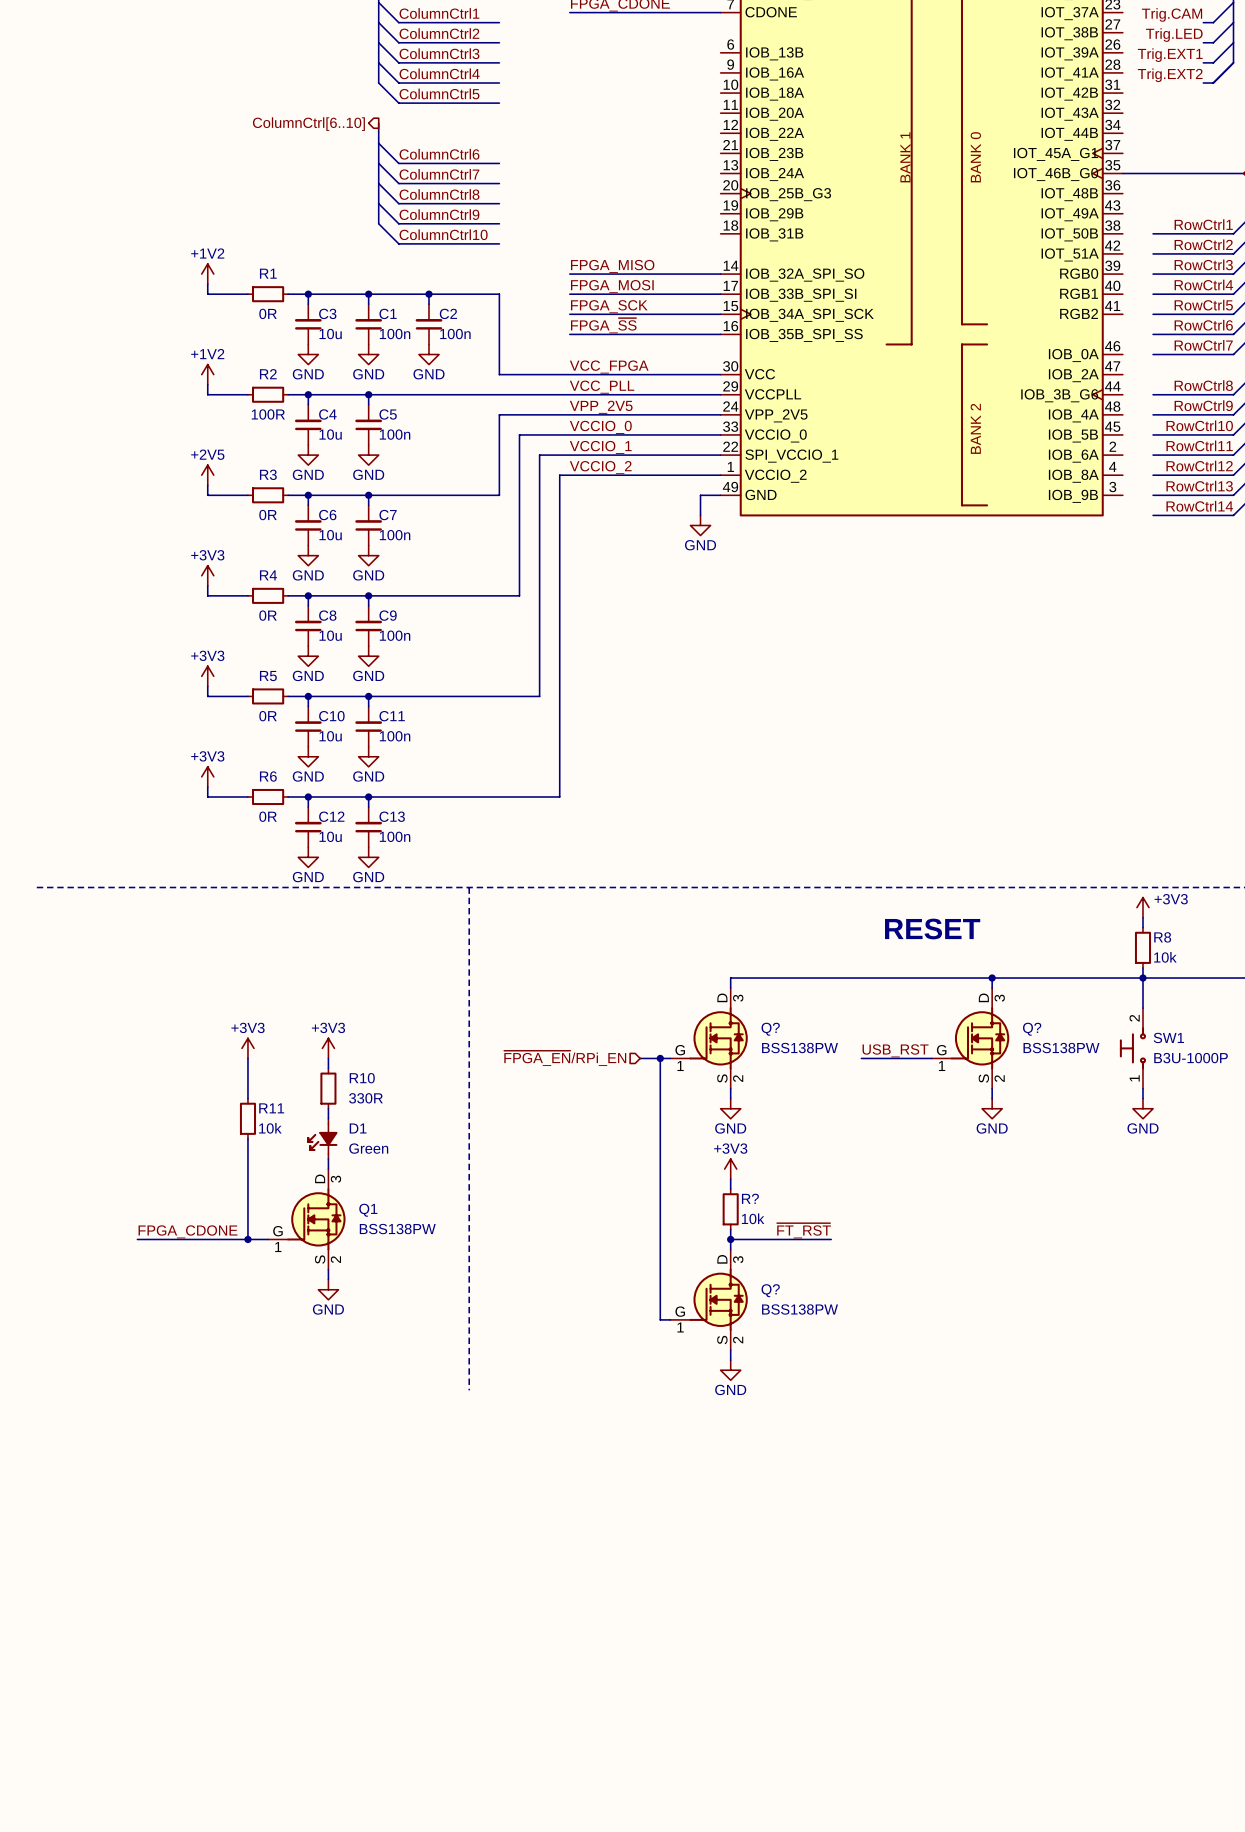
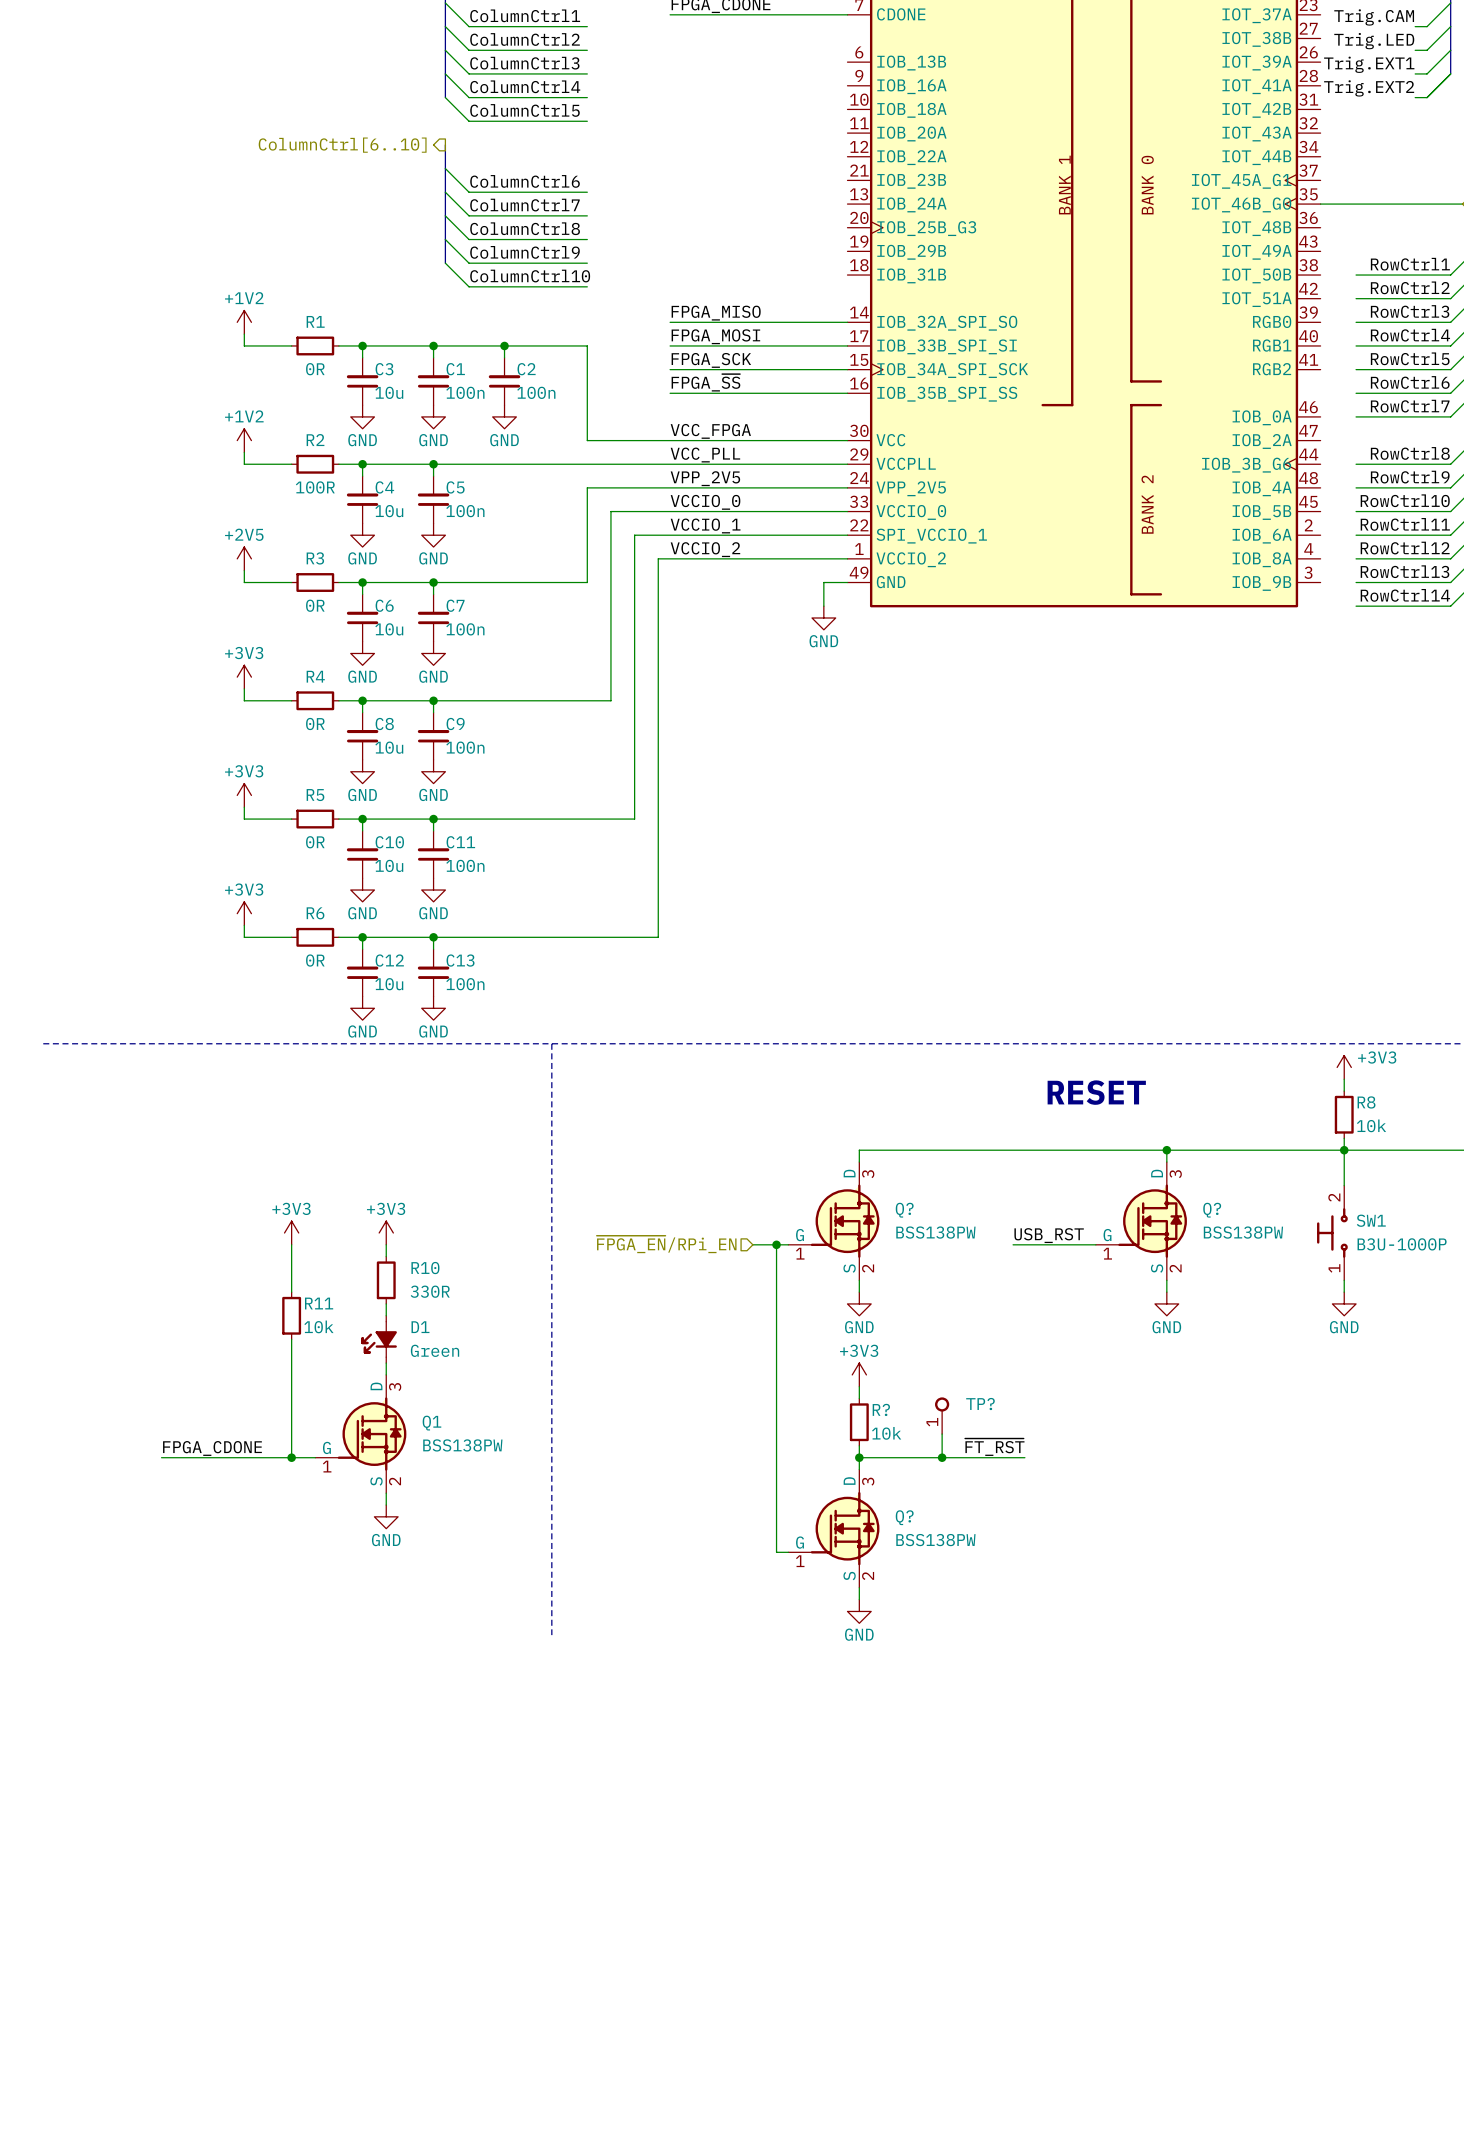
TP?: none -> (942, 1415)
wire: none -> (942, 1434) (942, 1457)
label position: ~{FT_RST} (803, 1230) -> ~{FT_RST} (994, 1447)
junction: none -> (942, 1457)
wire: none -> (977, 1457) (1024, 1457)

